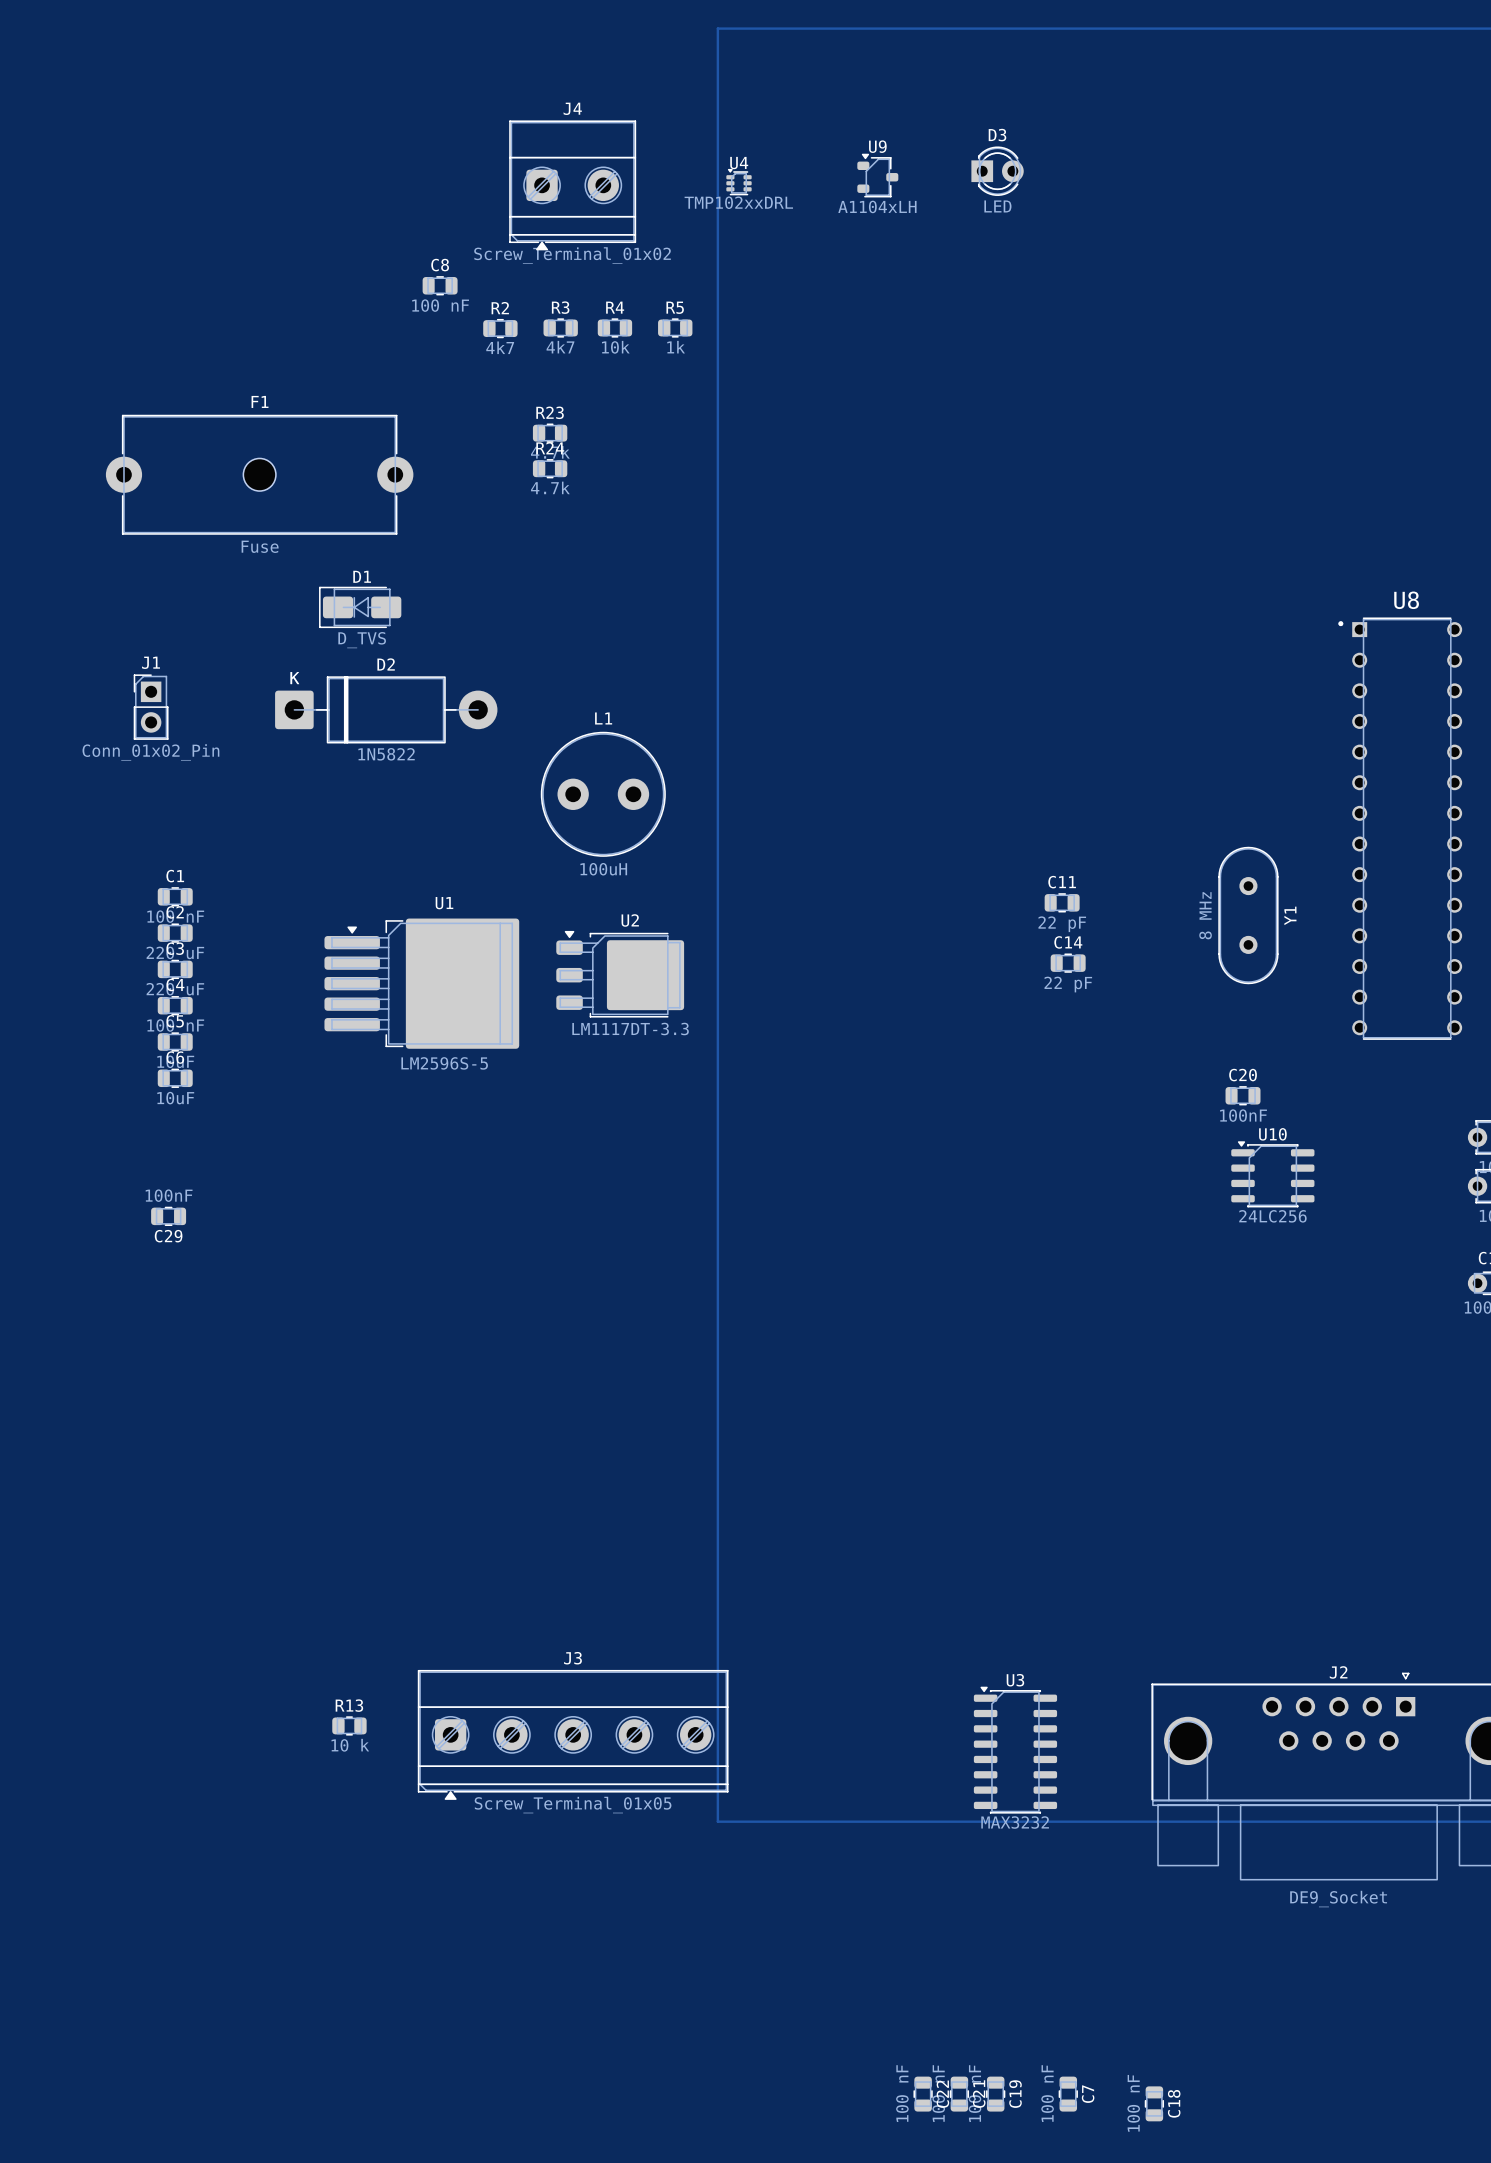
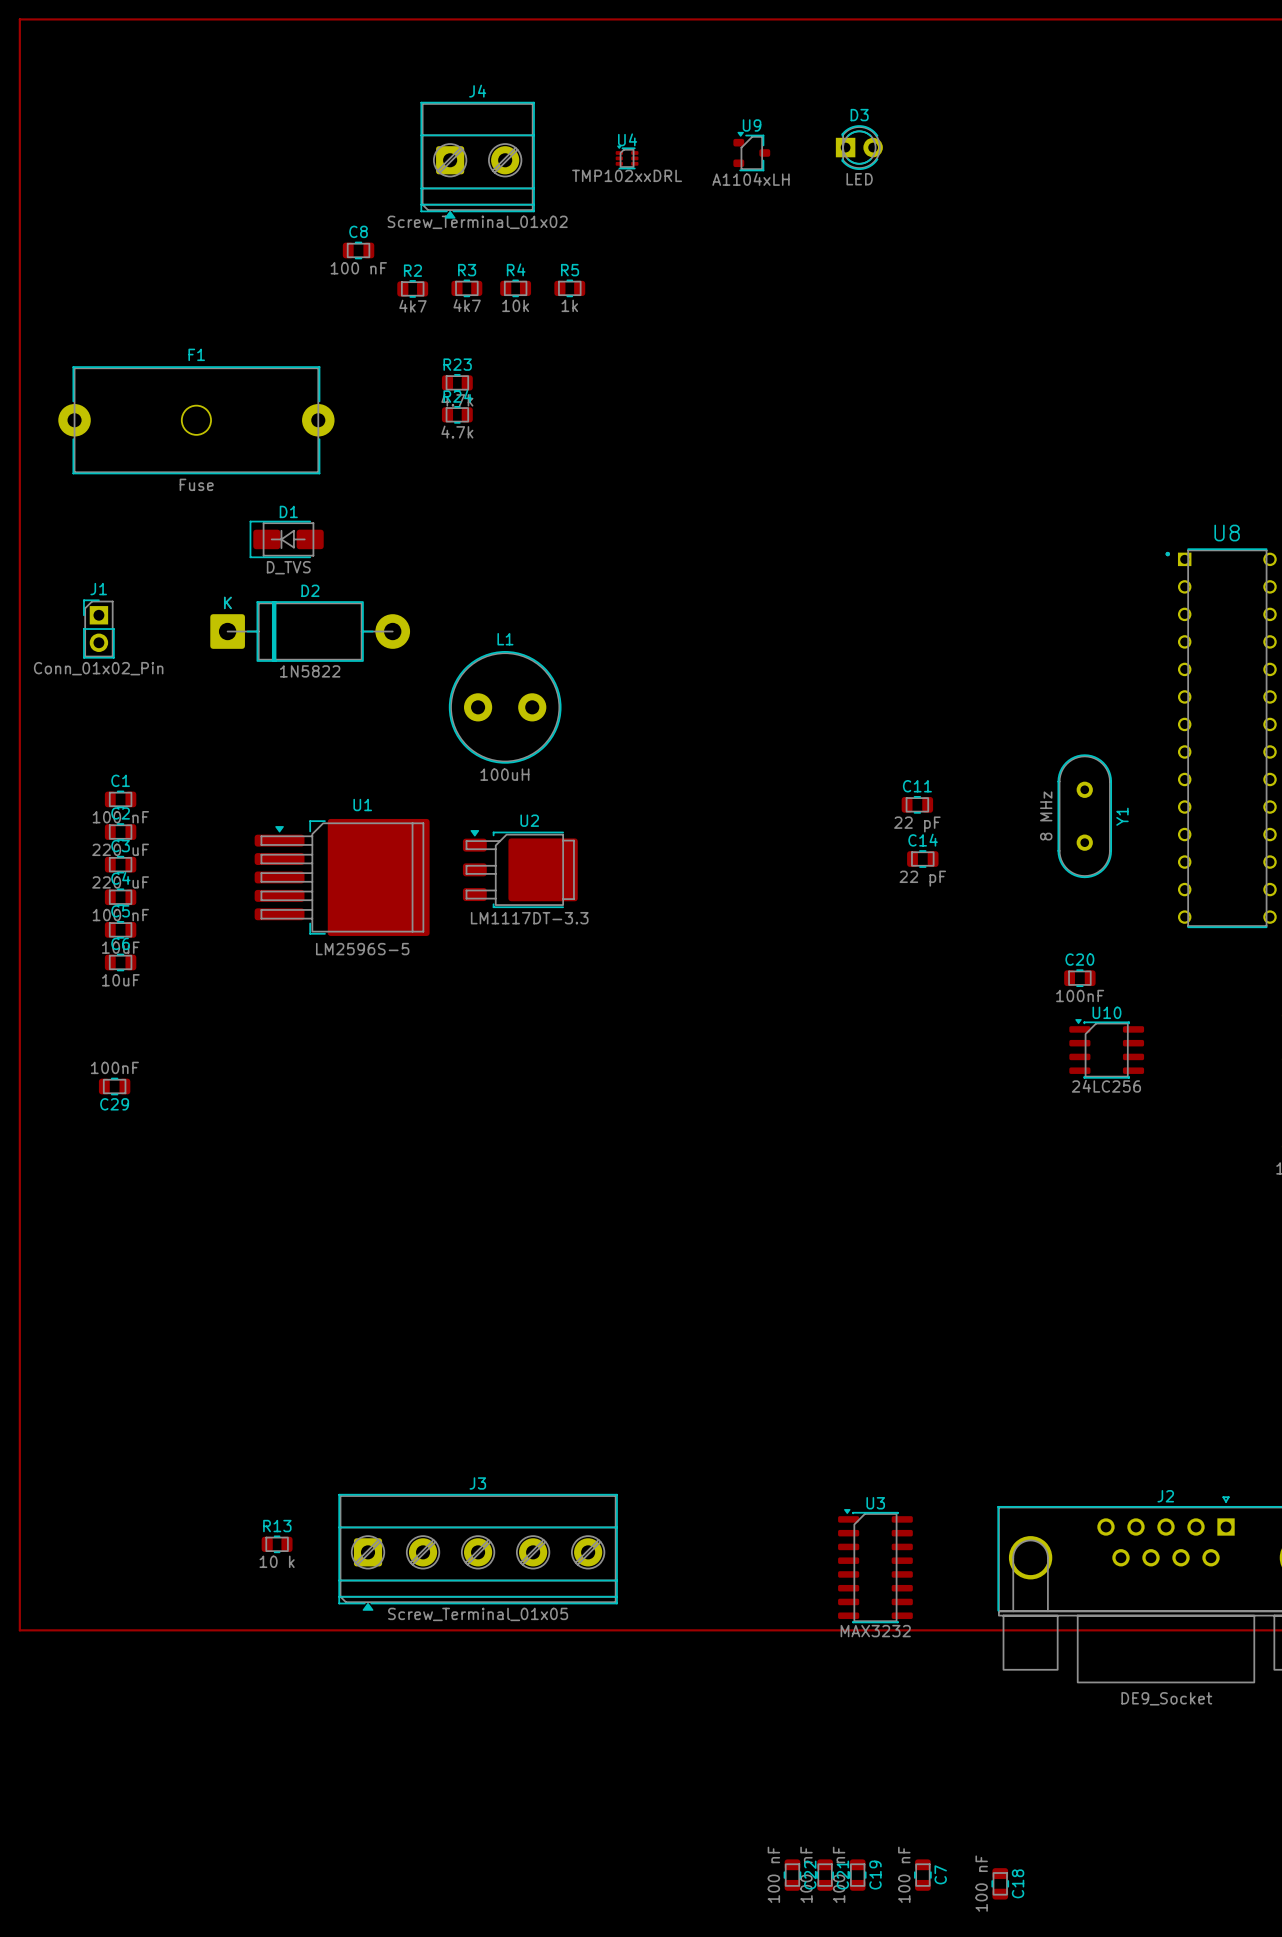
track: (717, 28) (717, 1821) -> (608, 19) (19, 19) (19, 1630) (608, 1630)

